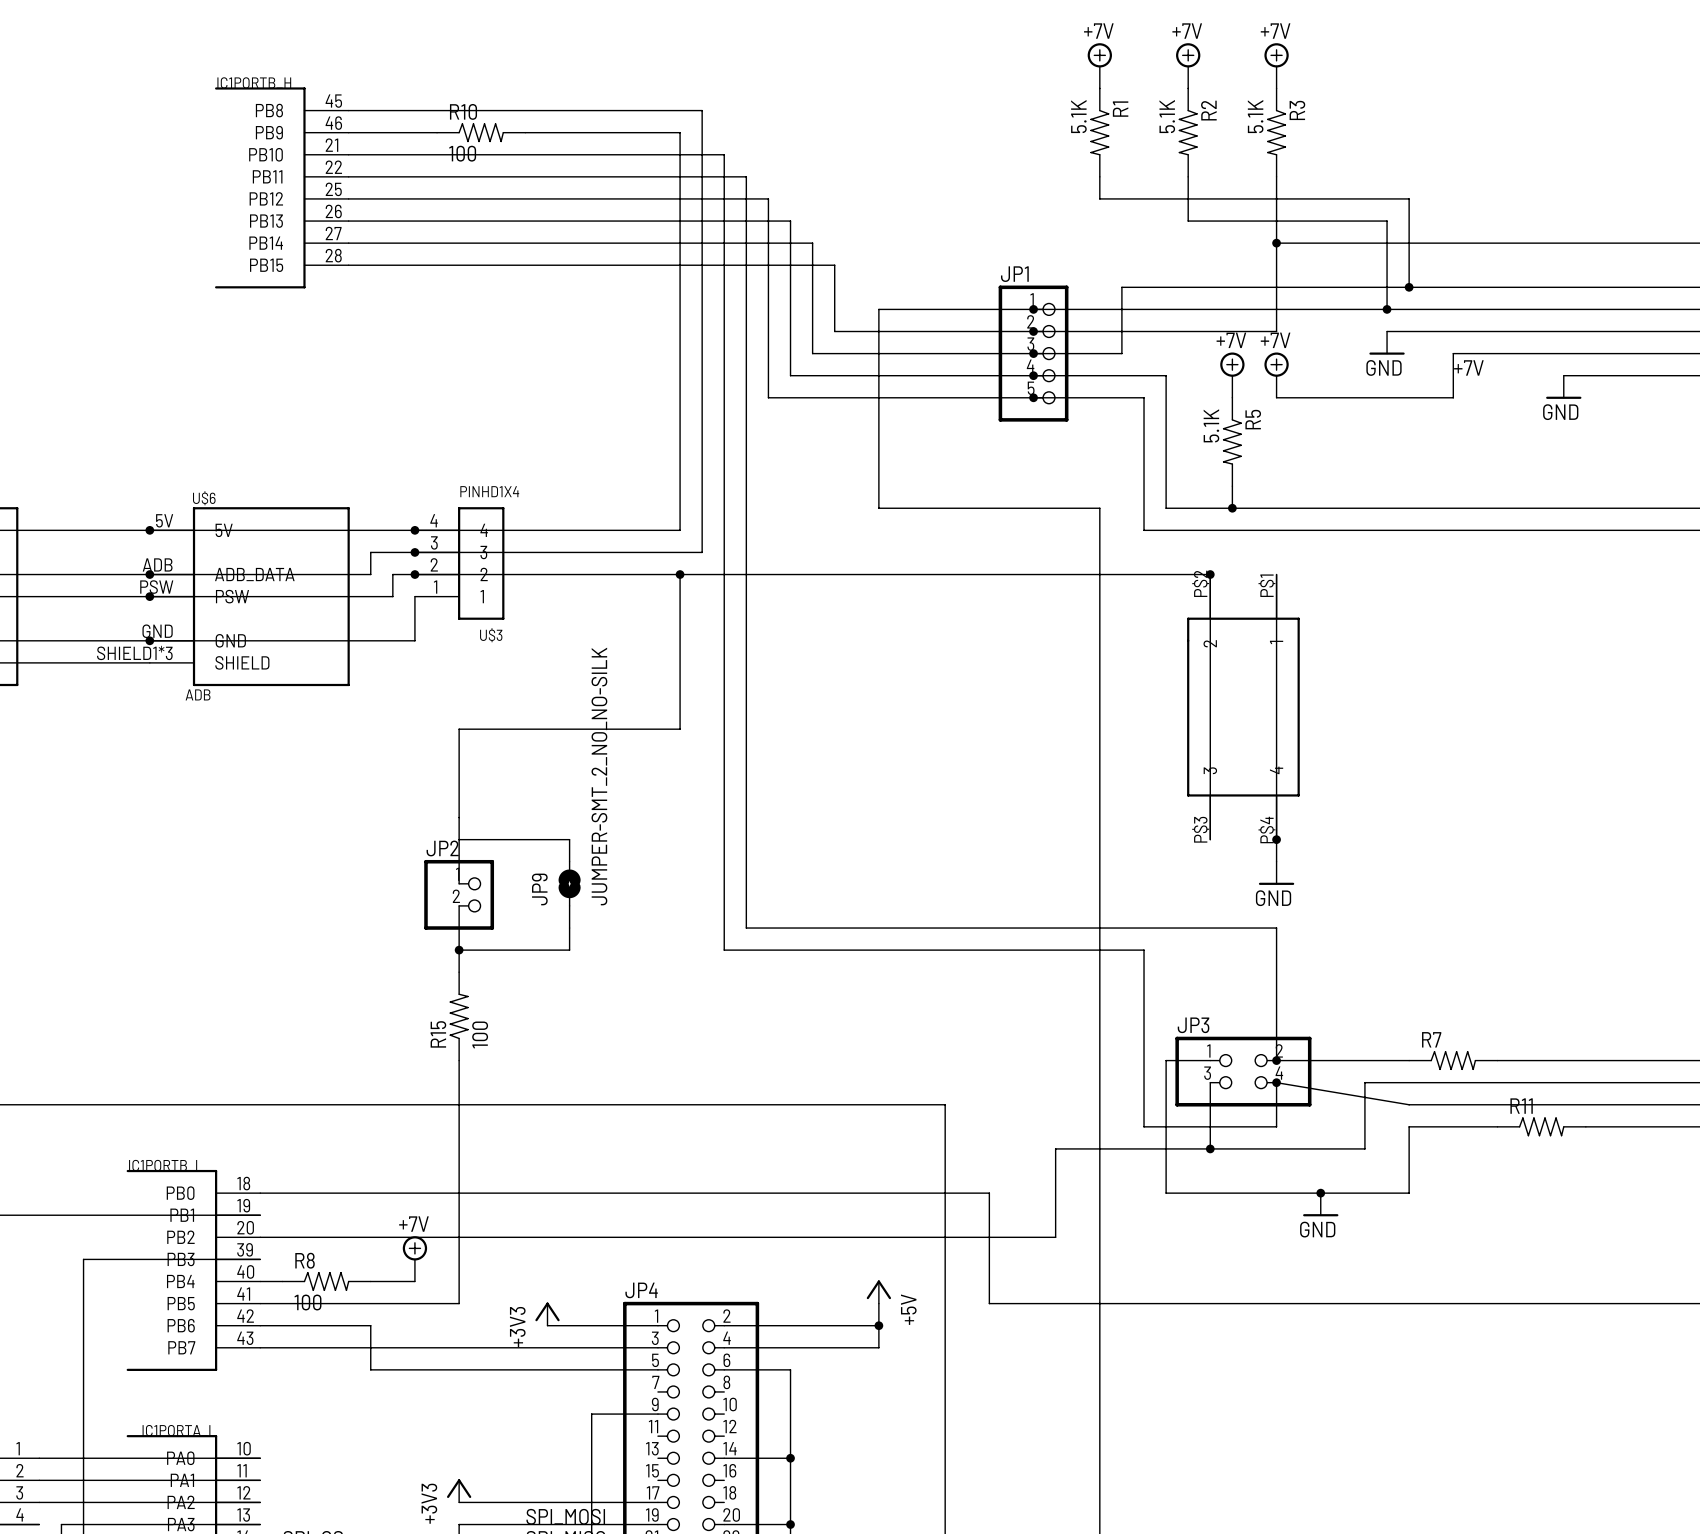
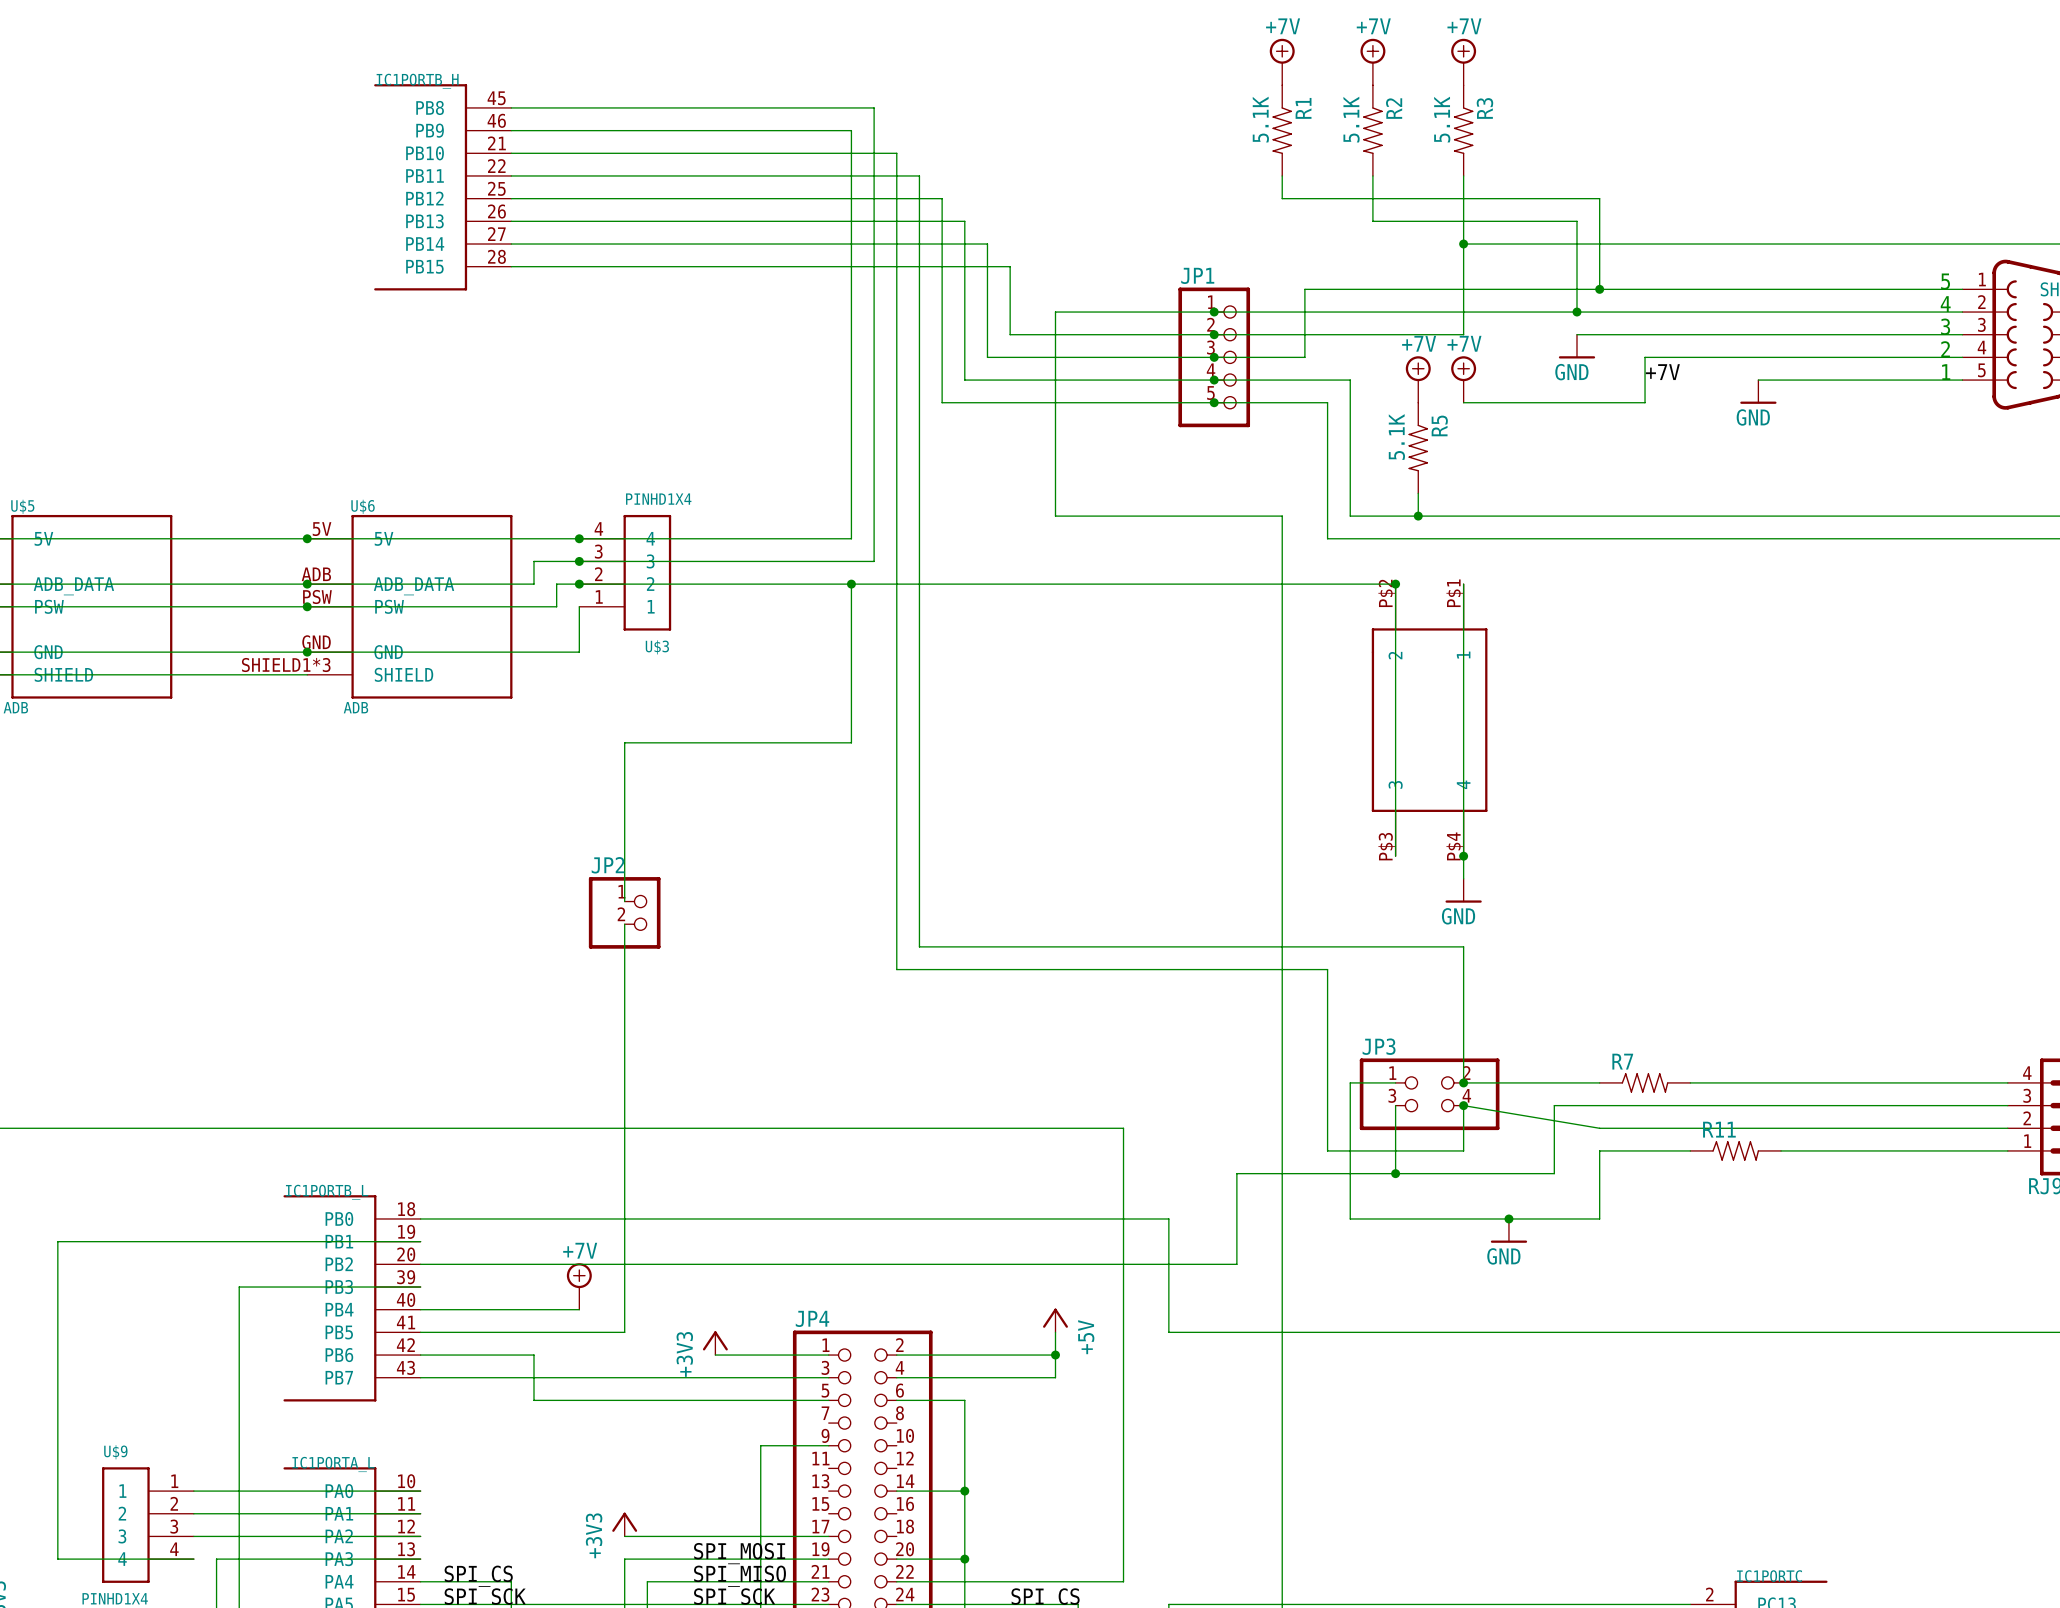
R10: 100 (481, 132) -> none
wire: (459, 839) (569, 839) -> none
JP9: JUMPER-SMT_2_NO_NO-SILK (569, 883) -> none
wire: (569, 928) (569, 950) (459, 950) -> none
junction: (459, 950) -> none
R15: 100 (459, 1016) -> none
R8: 100 (326, 1281) -> none

